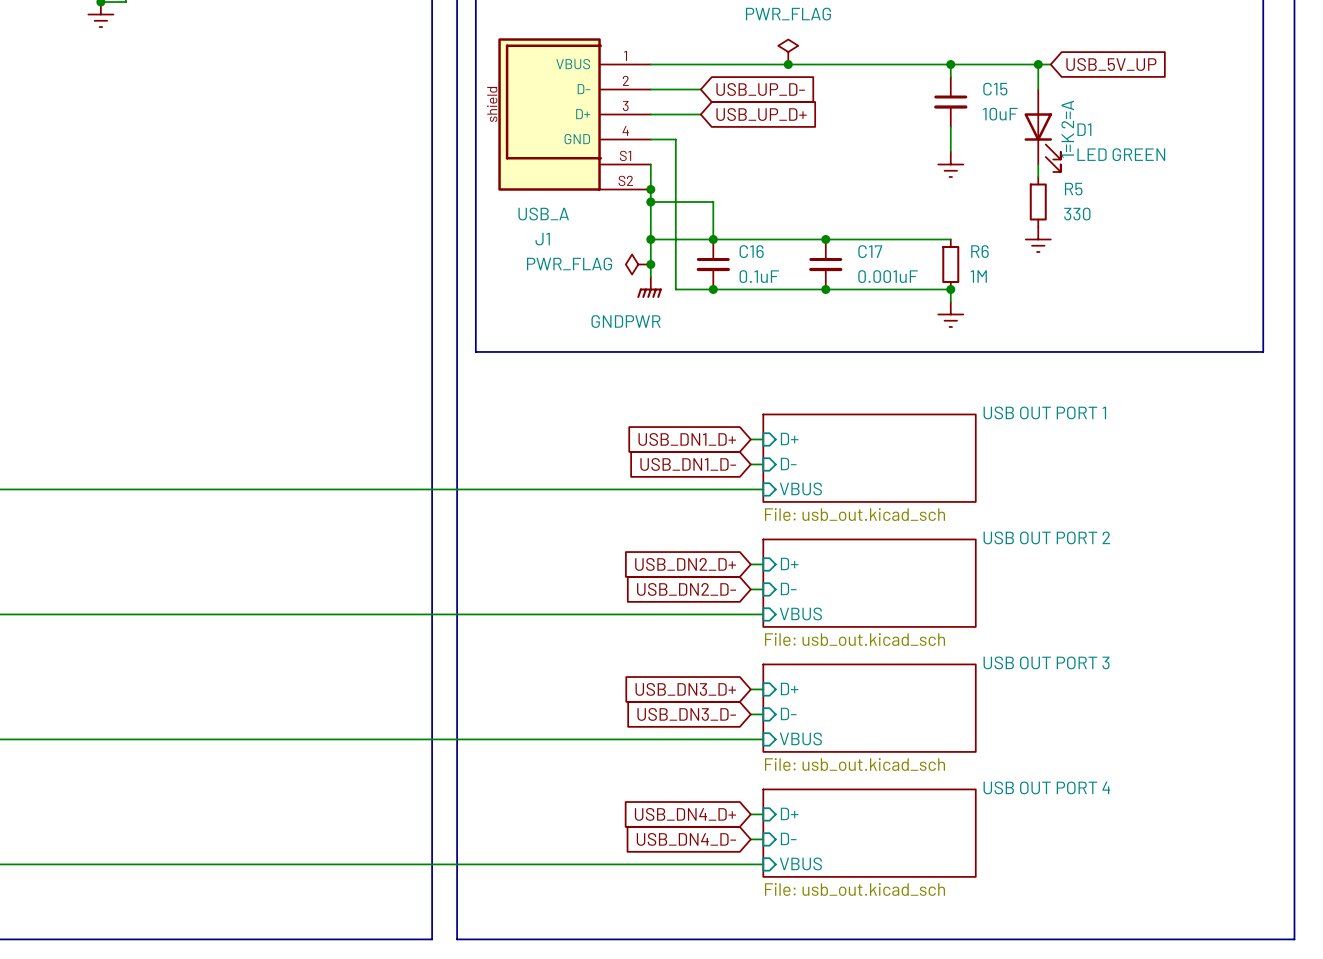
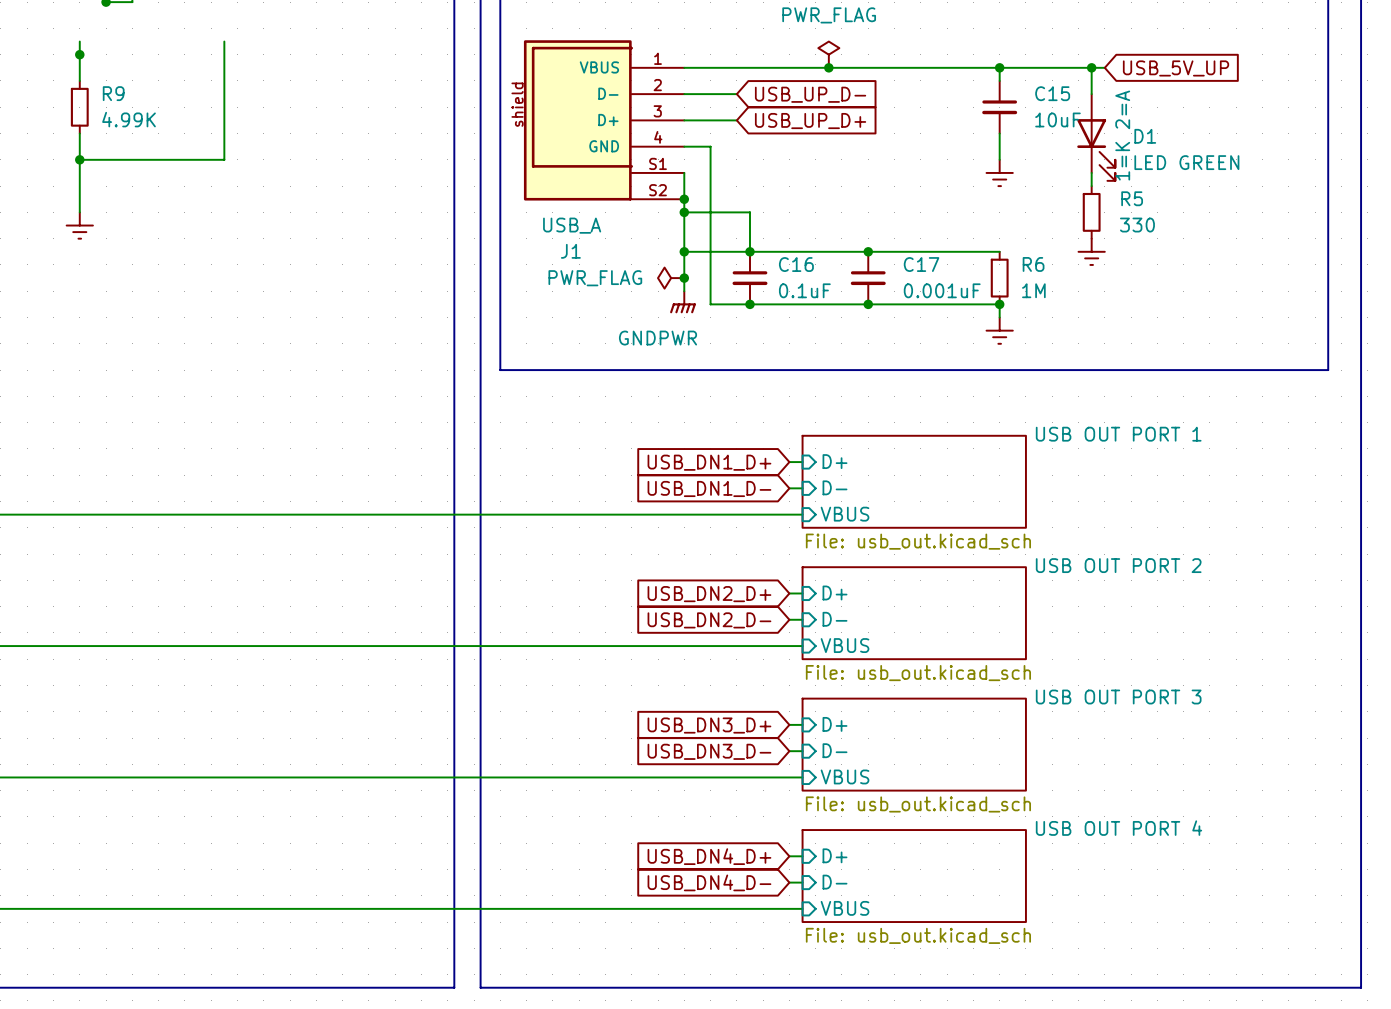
power symbol: (100, 14) -> none
wire: none -> (79, 41) (79, 80)
wire: none -> (224, 41) (224, 159) (79, 159)
junction: none -> (79, 54)
R9: none -> 4.99K (79, 107)
wire: none -> (79, 133) (79, 212)
junction: none -> (79, 159)
power symbol: none -> (79, 225)

